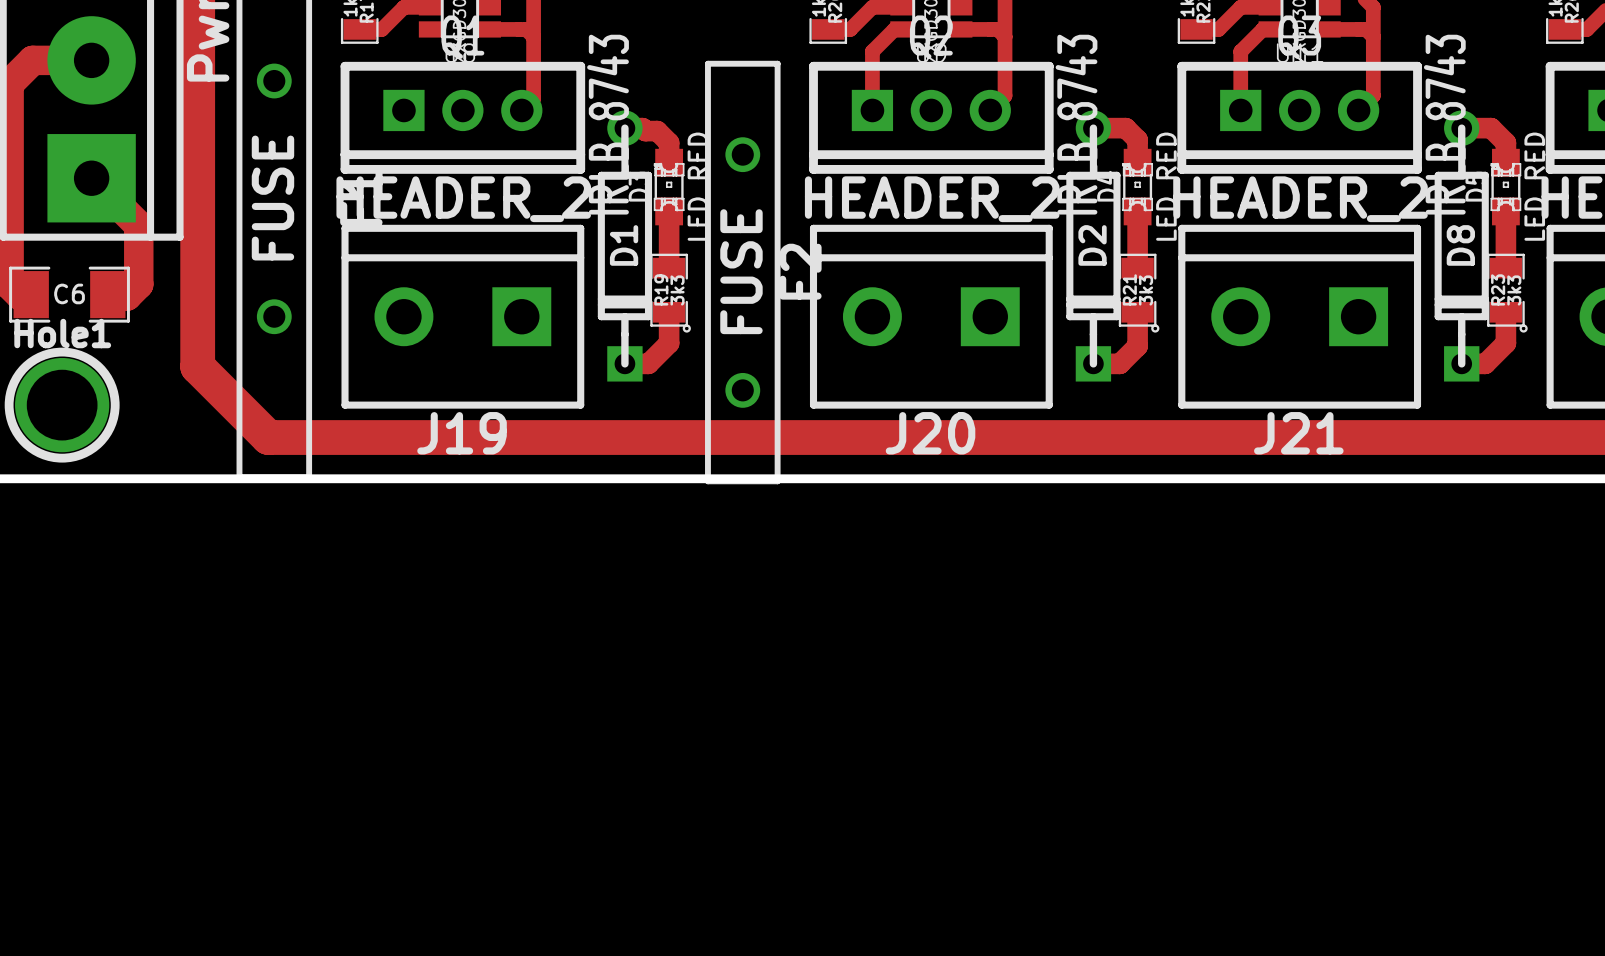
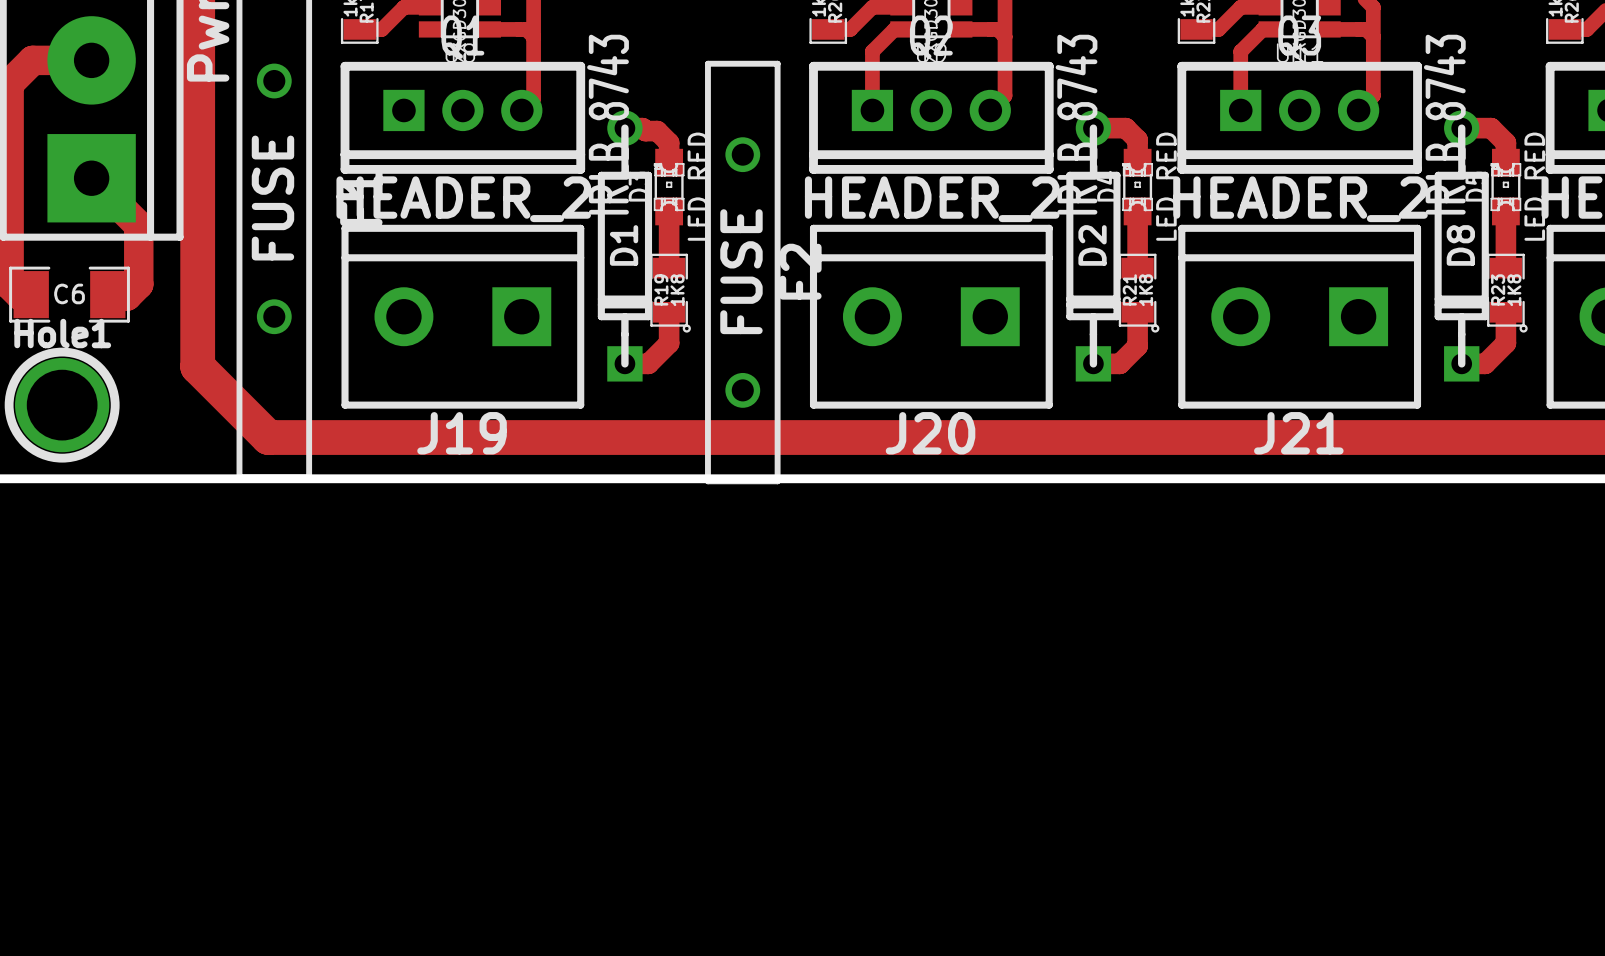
R19 value: 3k3 (677, 290) -> 1K8 (677, 290)
R21 value: 3k3 (1146, 290) -> 1K8 (1146, 290)
R23 value: 3k3 (1514, 290) -> 1K8 (1514, 290)

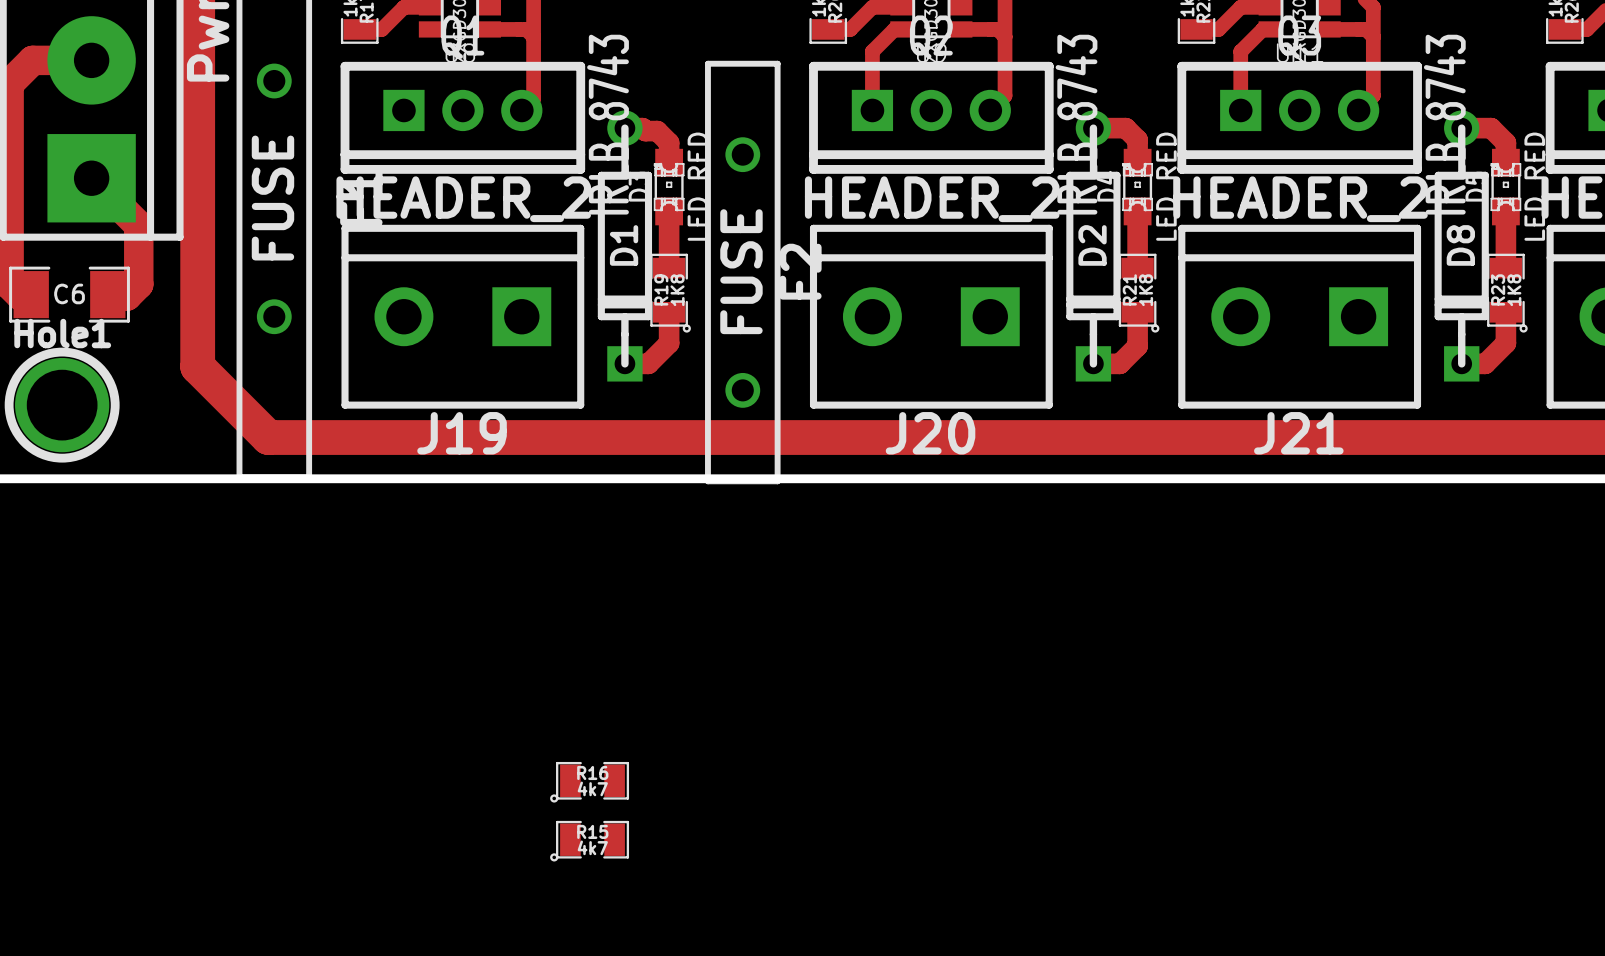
R16: none -> 4k7 (589, 782)
R15: none -> 4k7 (589, 841)

